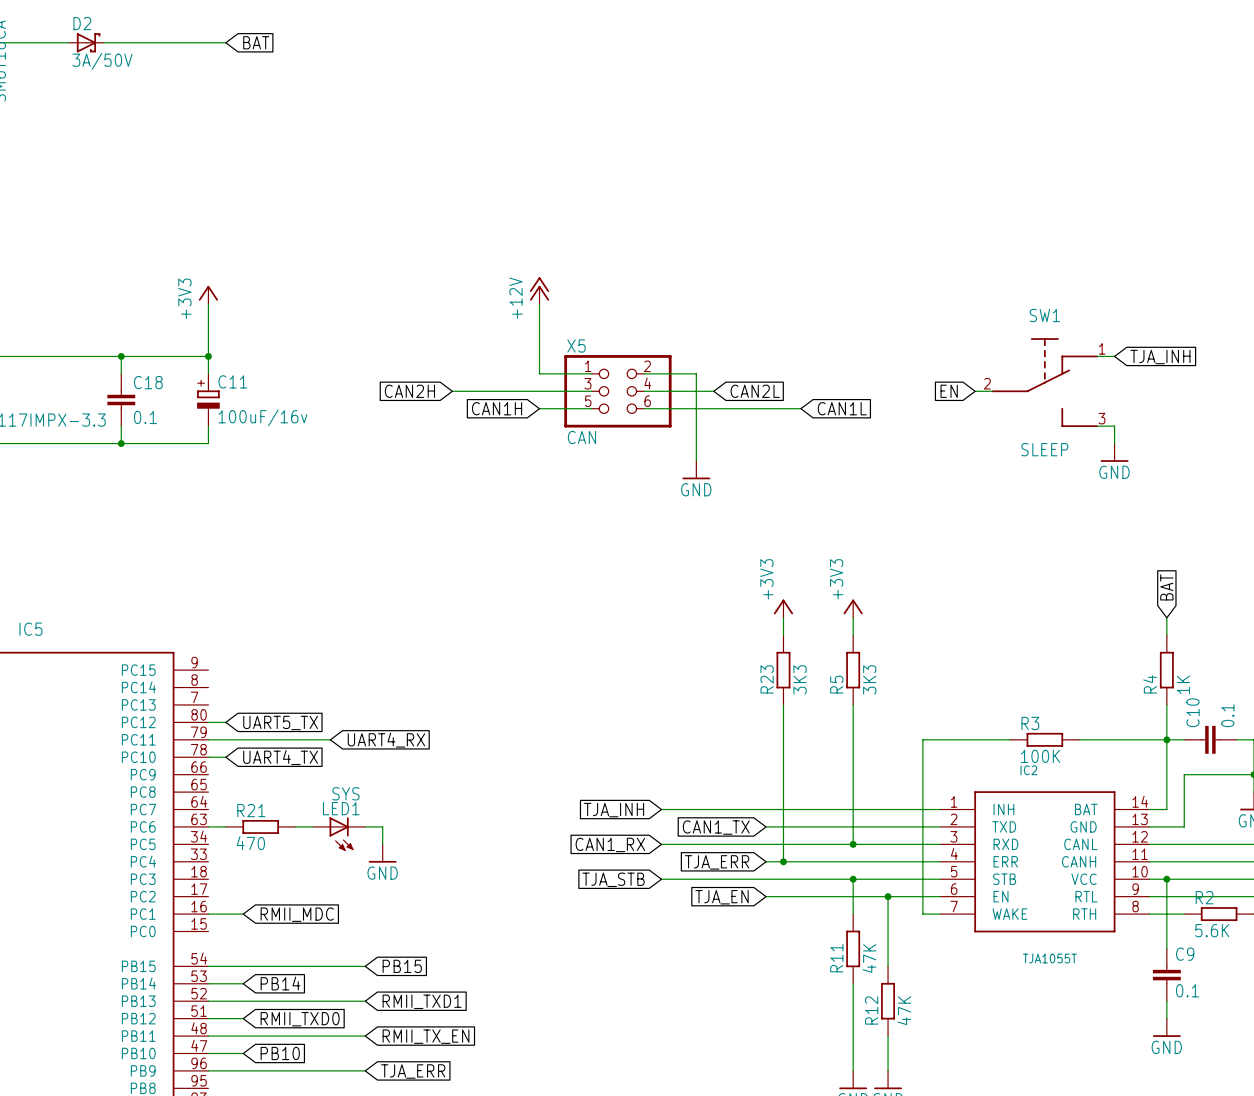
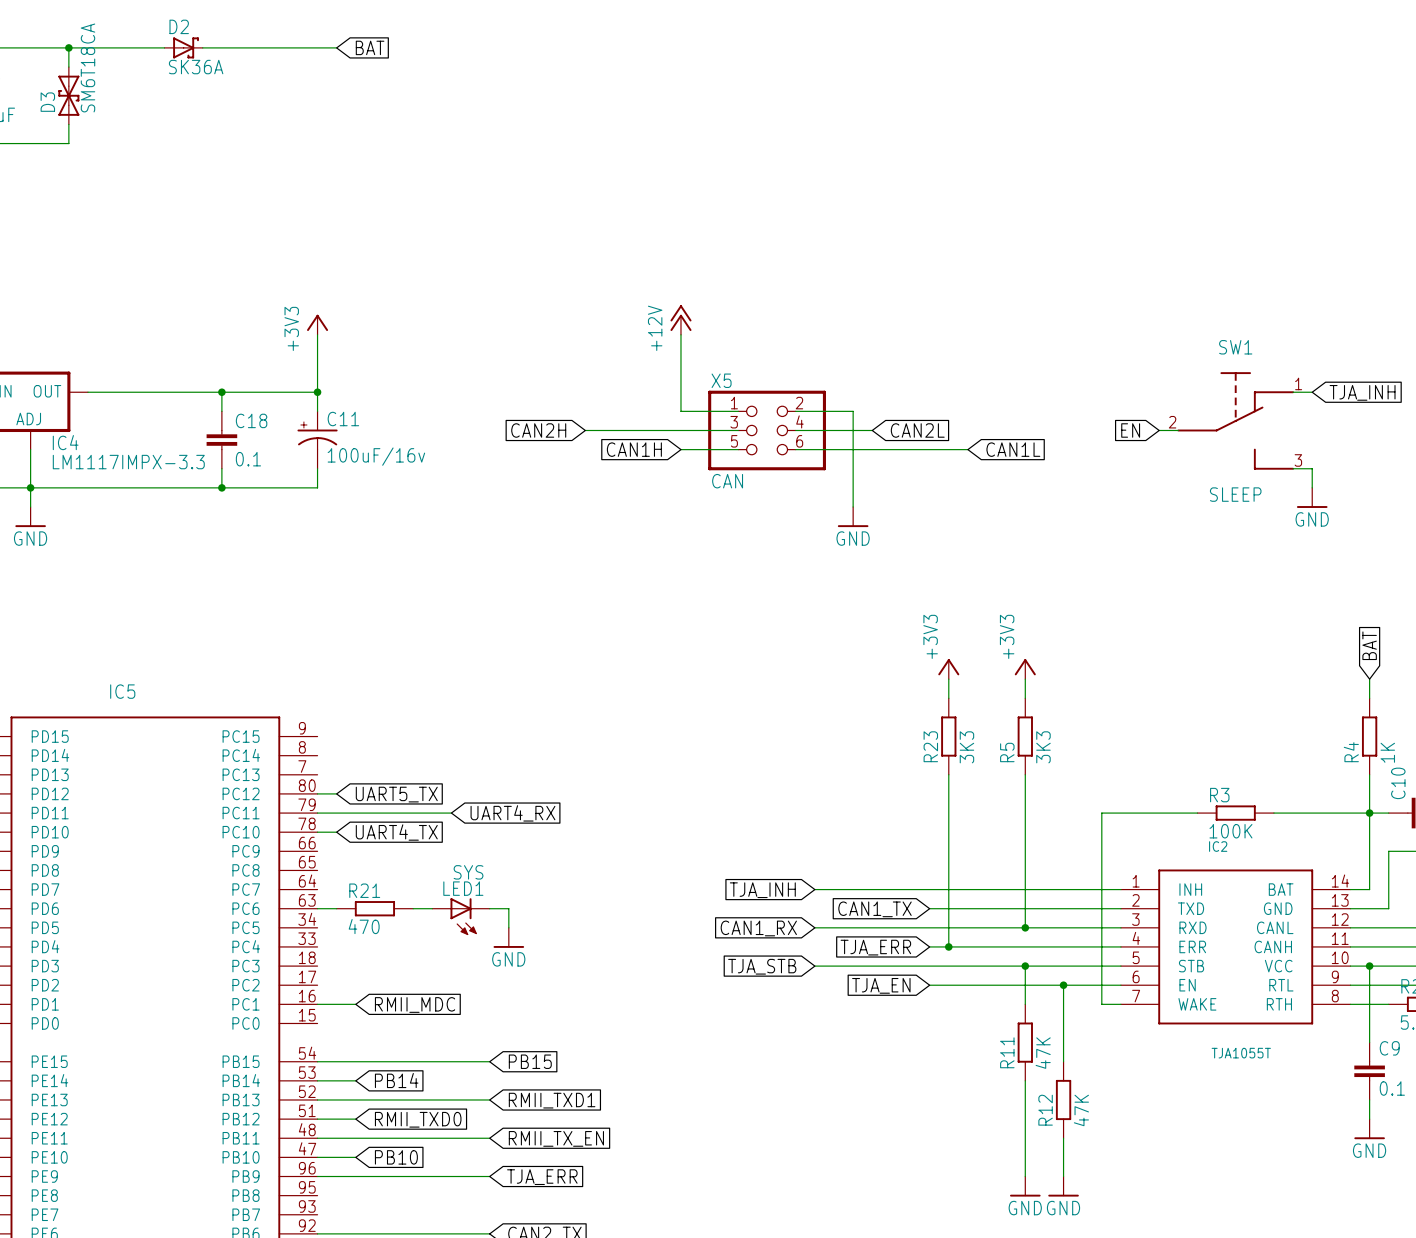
D2 value: 3A/50V (102, 61) -> SK36A (196, 67)
C11 symbol: [197, 373, 220, 427] -> [297, 411, 338, 469]

